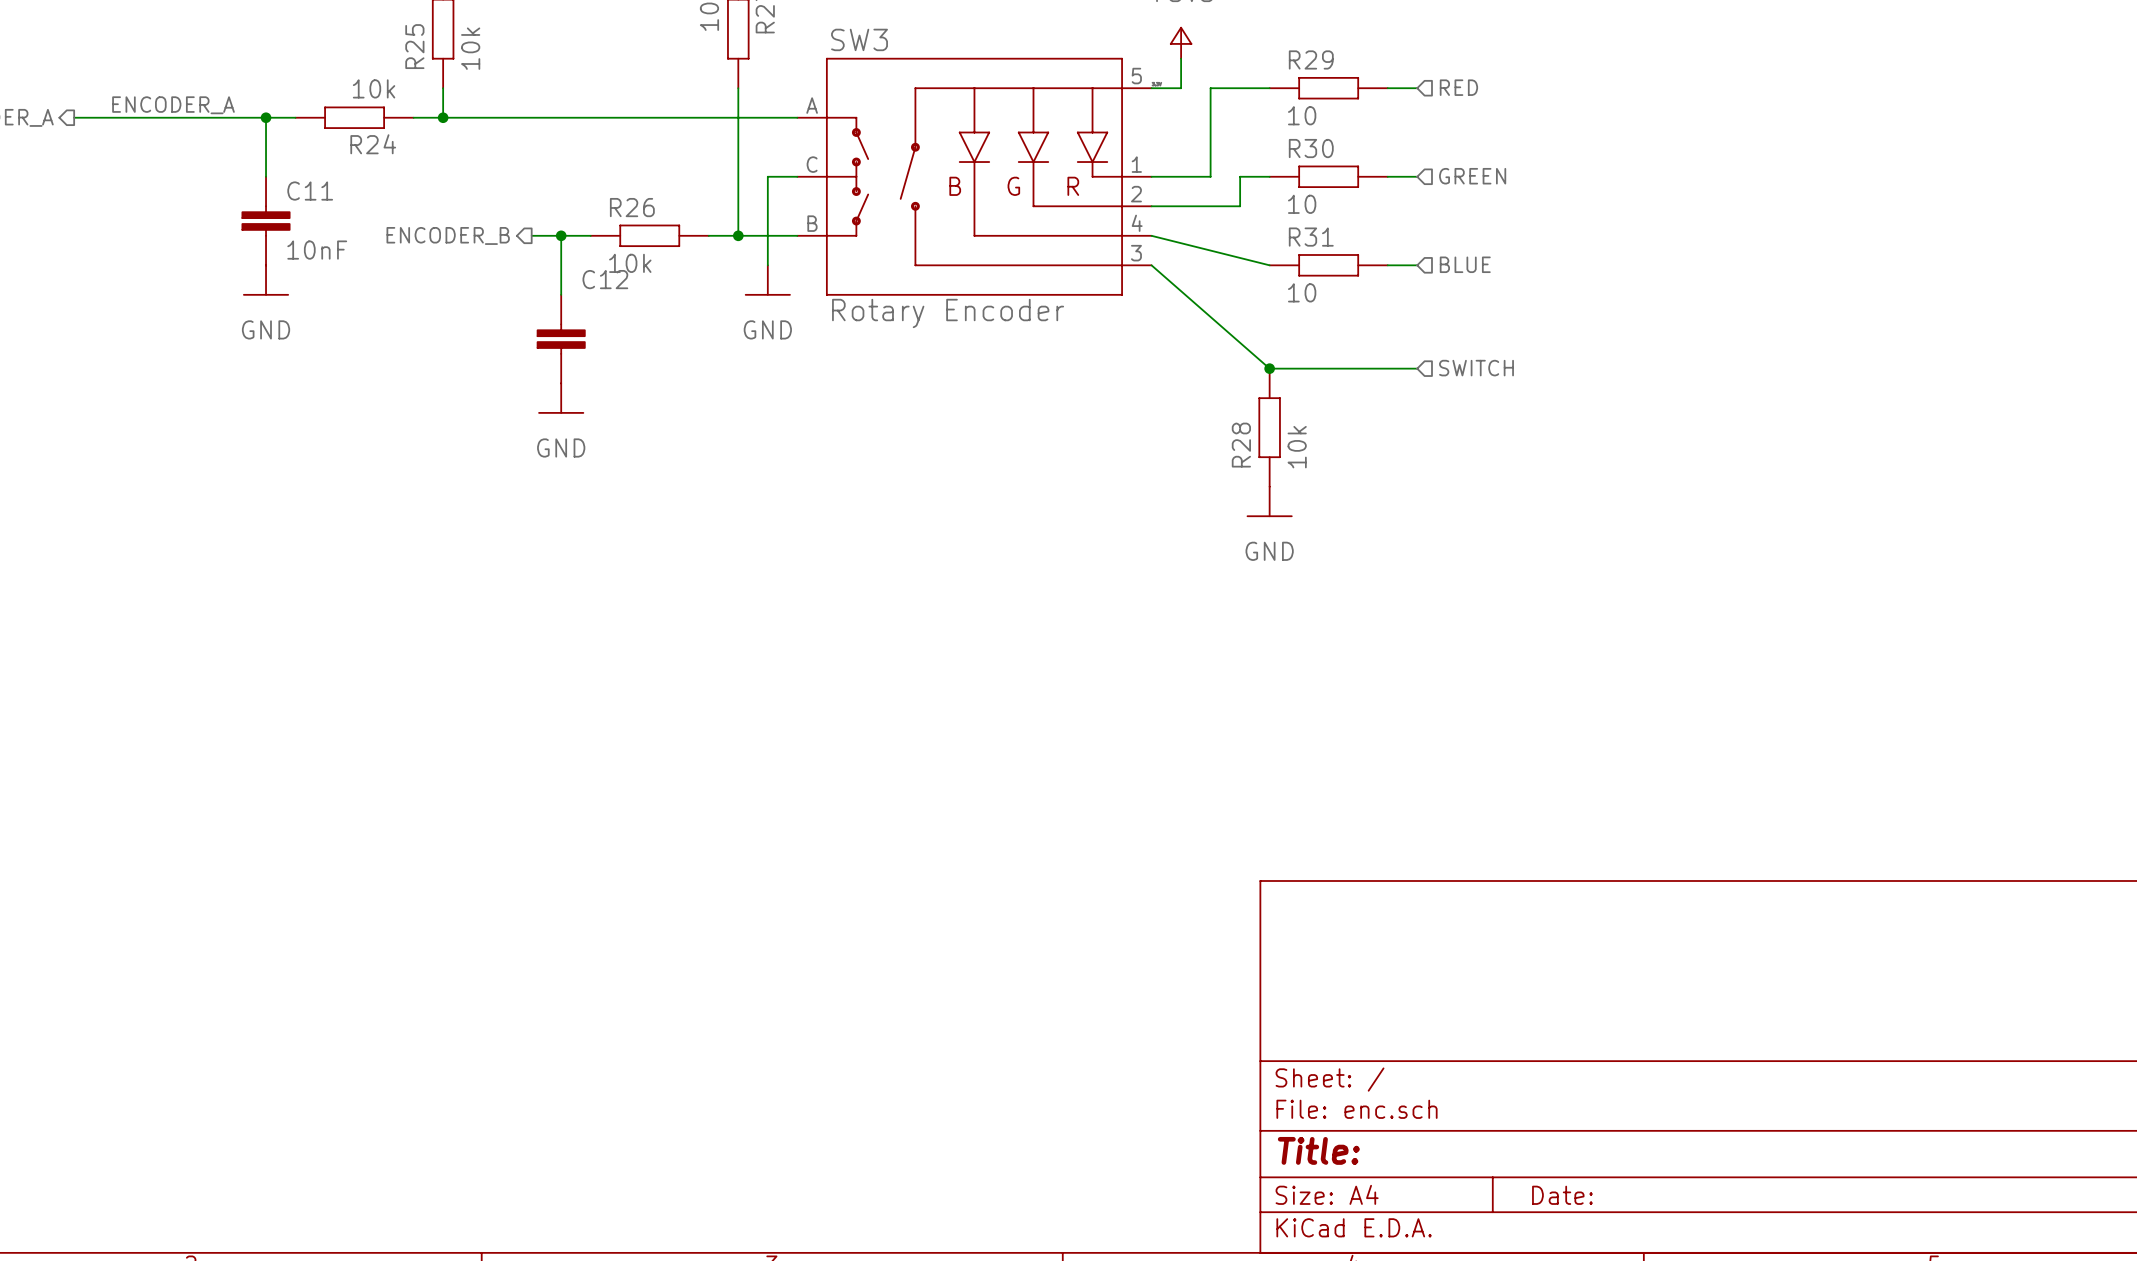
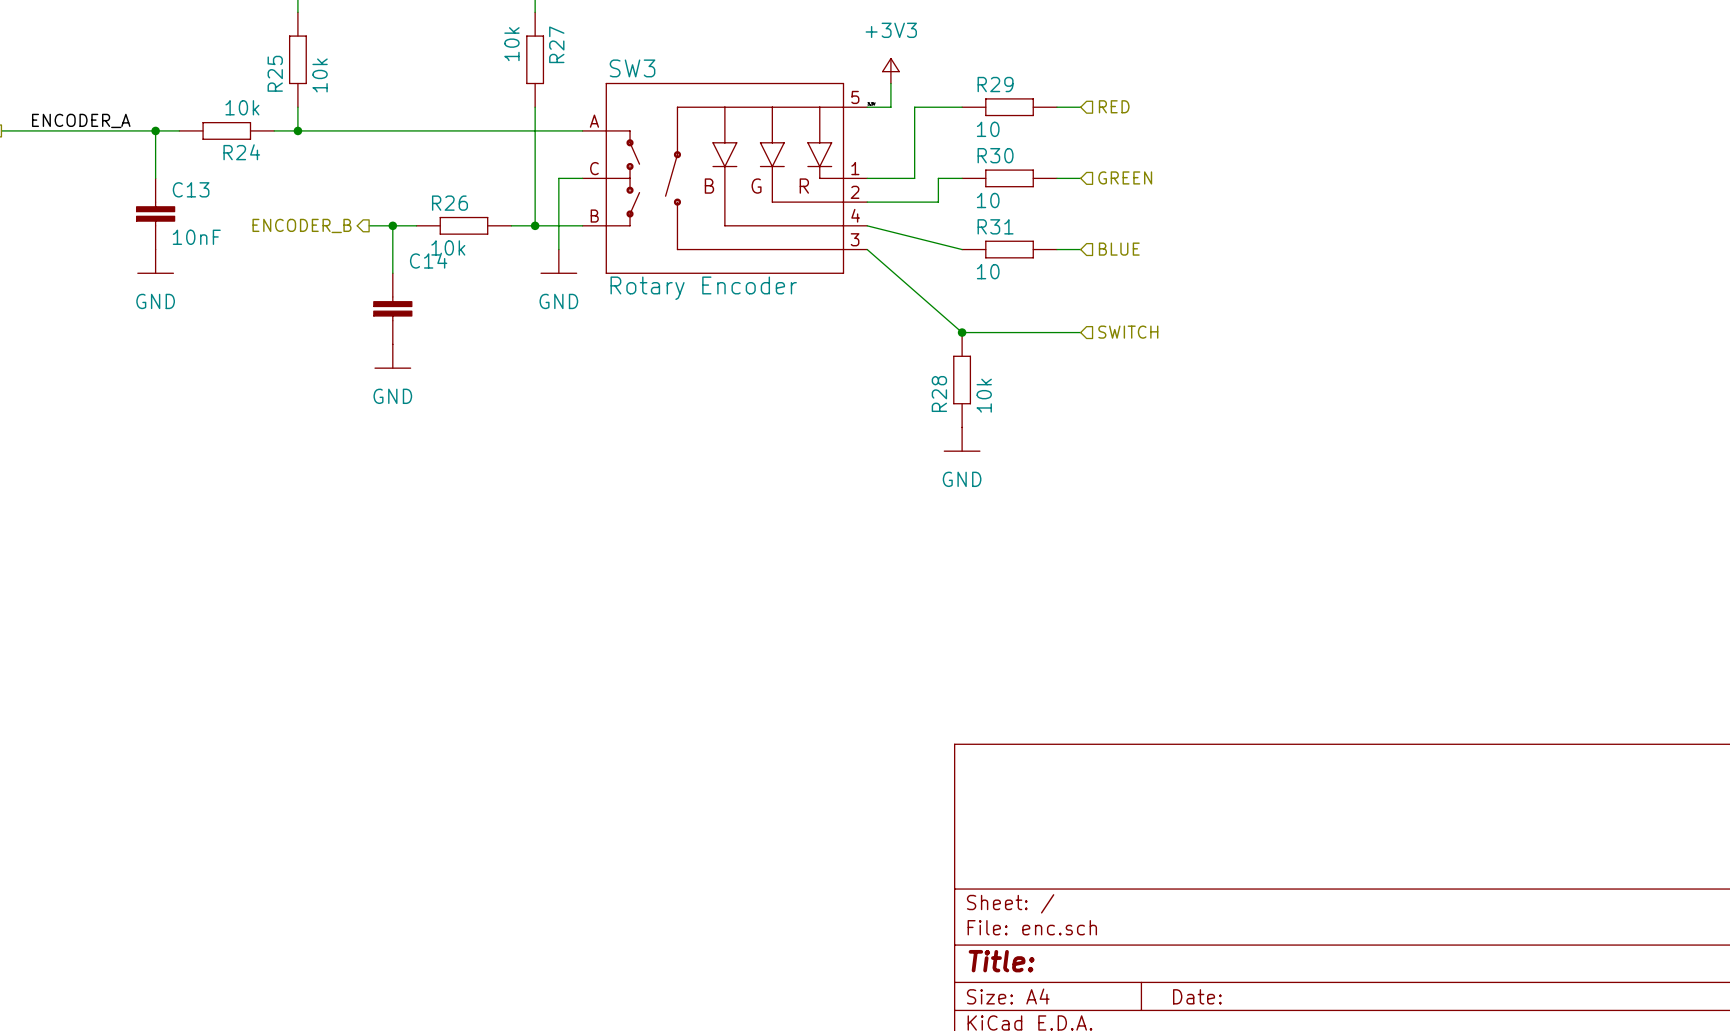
C11 name: C11 (310, 191) -> C13 (191, 189)
C12 name: C12 (605, 279) -> C14 (428, 260)

